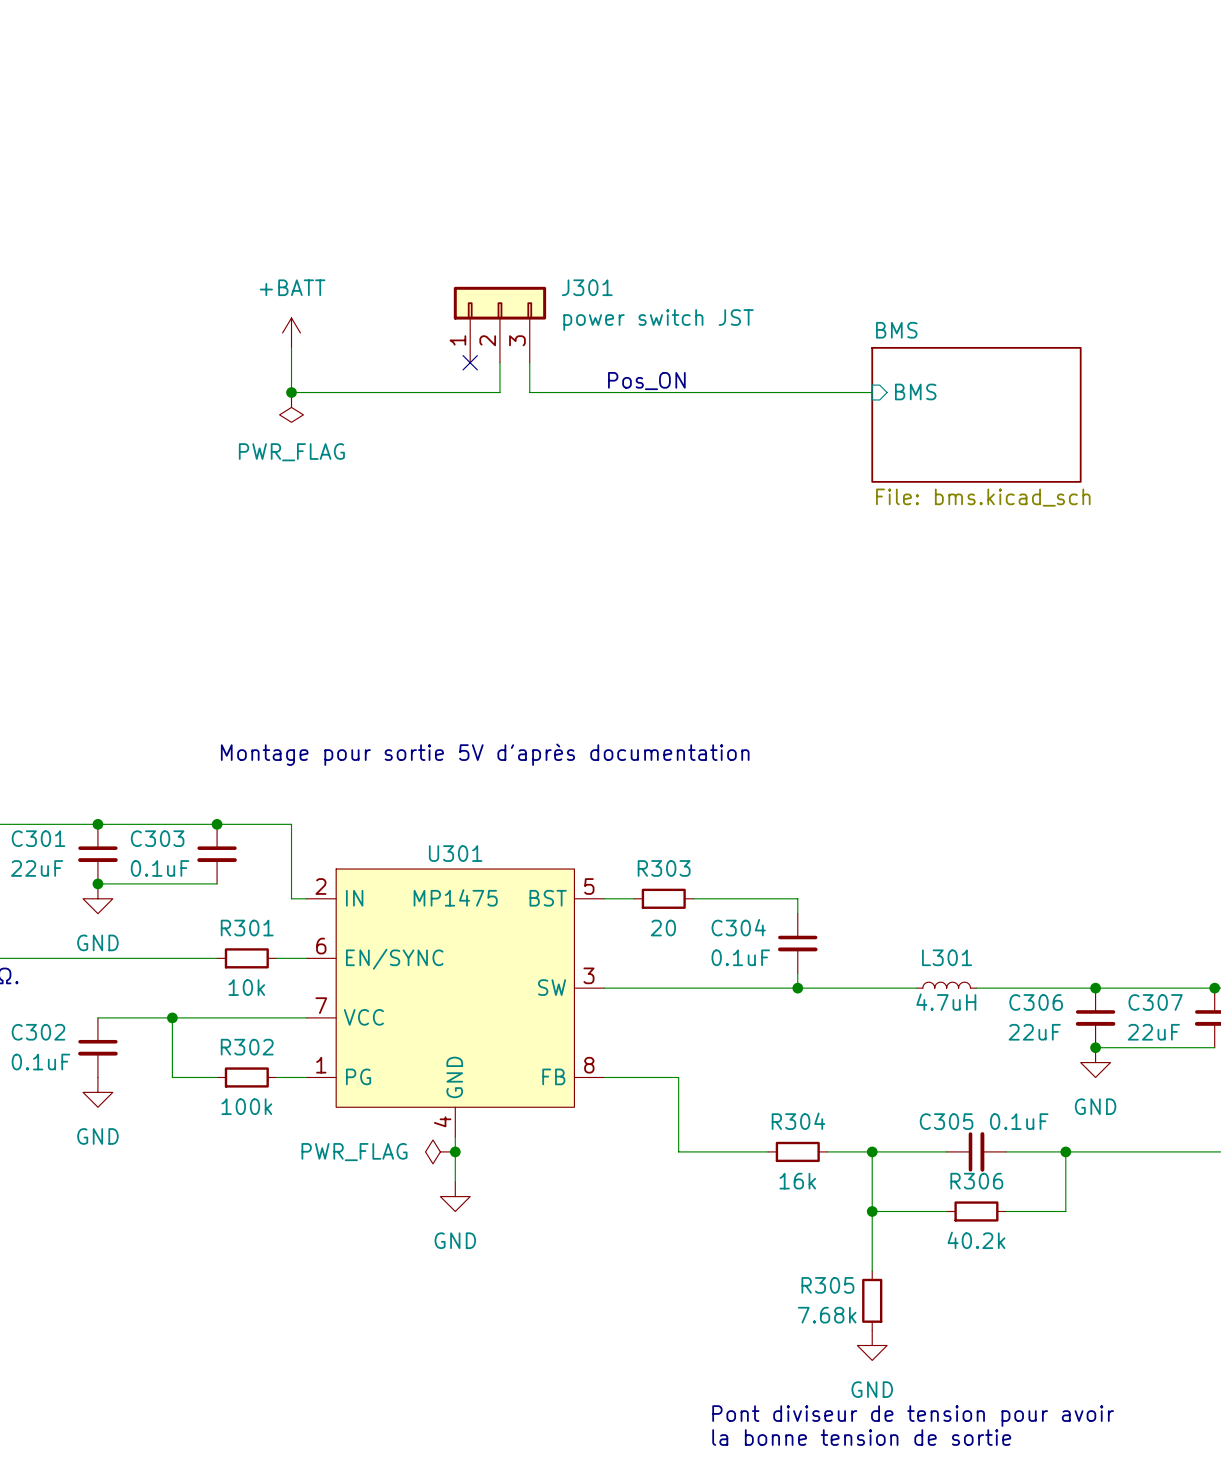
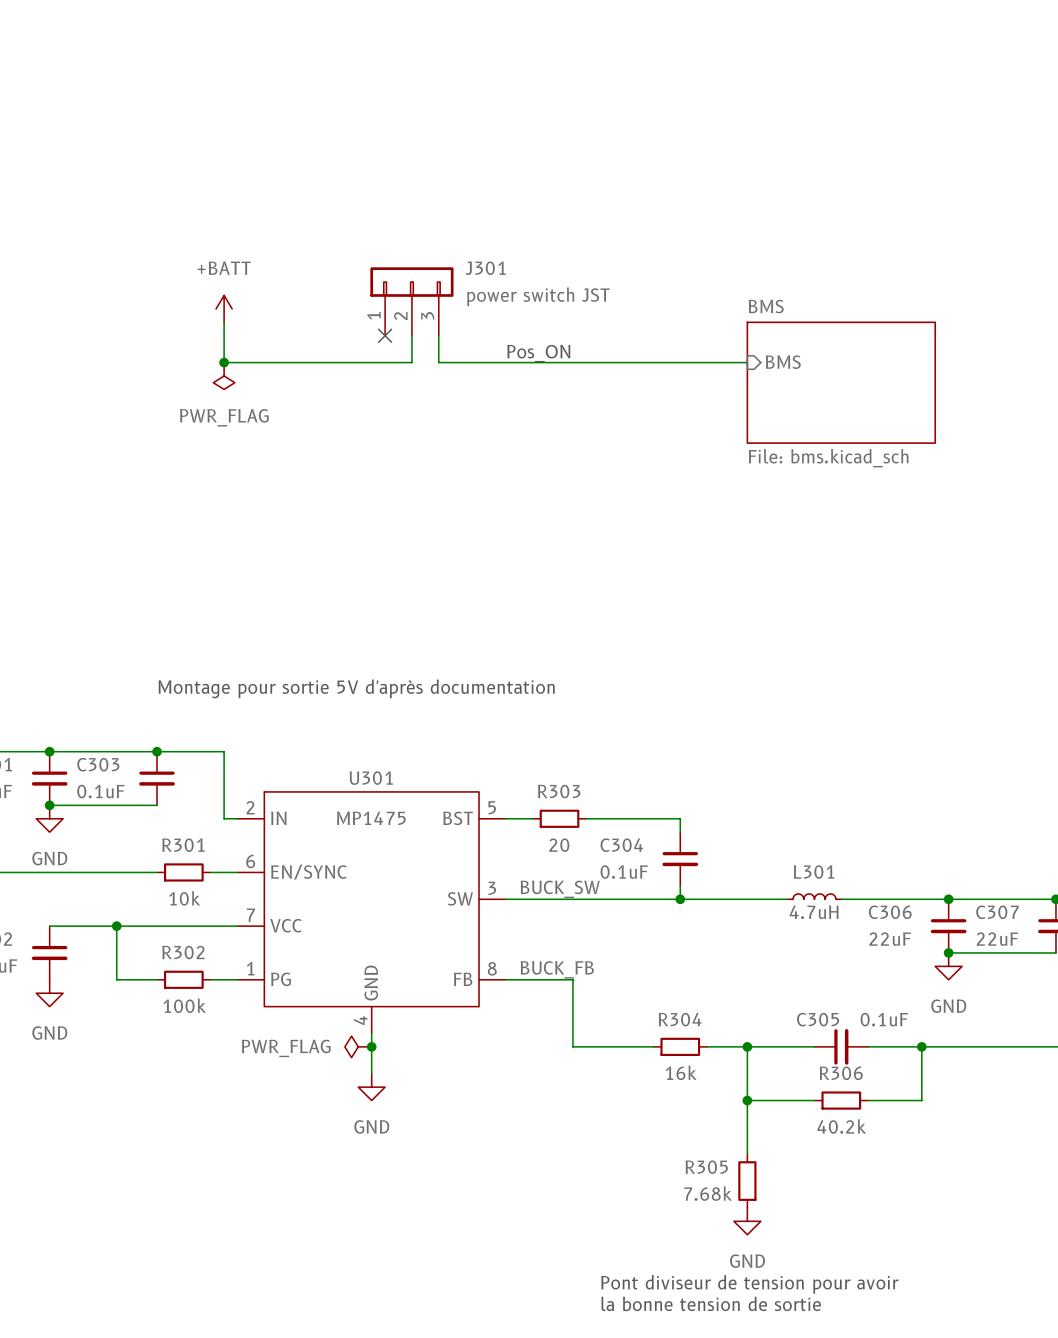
label: none -> BUCK_SW (560, 889)
label: none -> BUCK_FB (557, 969)

